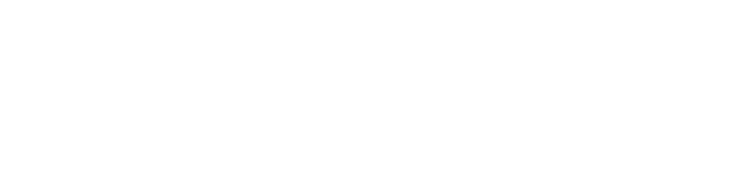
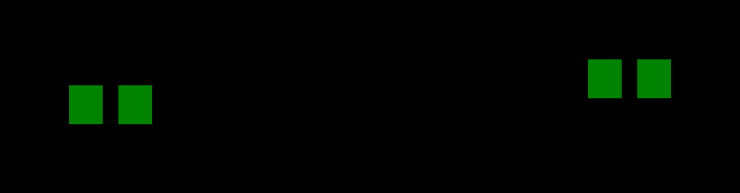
part: none -> (629, 78)
part: none -> (110, 104)

